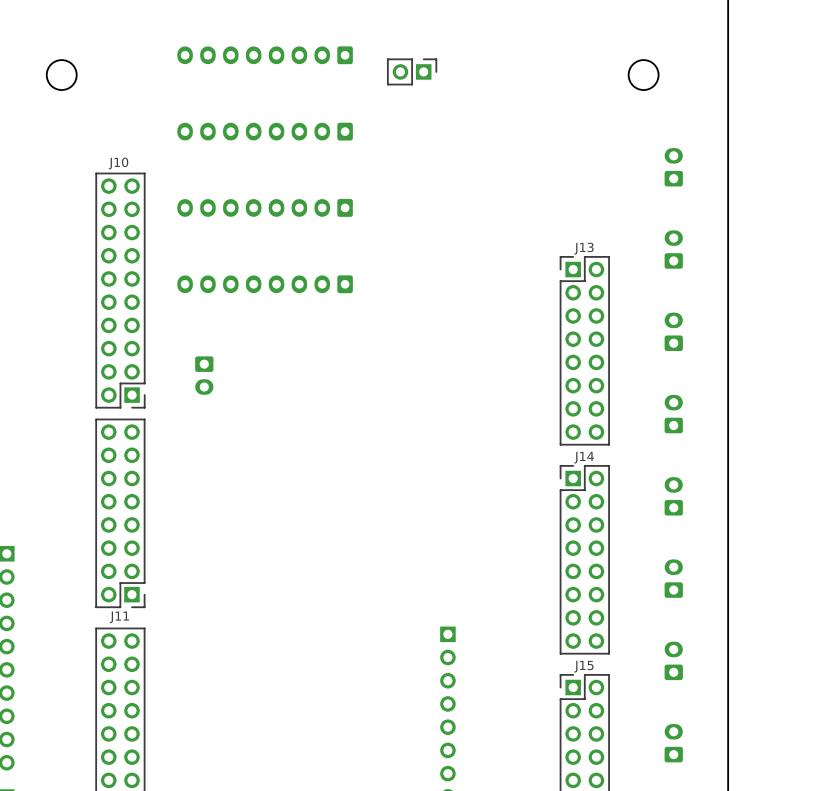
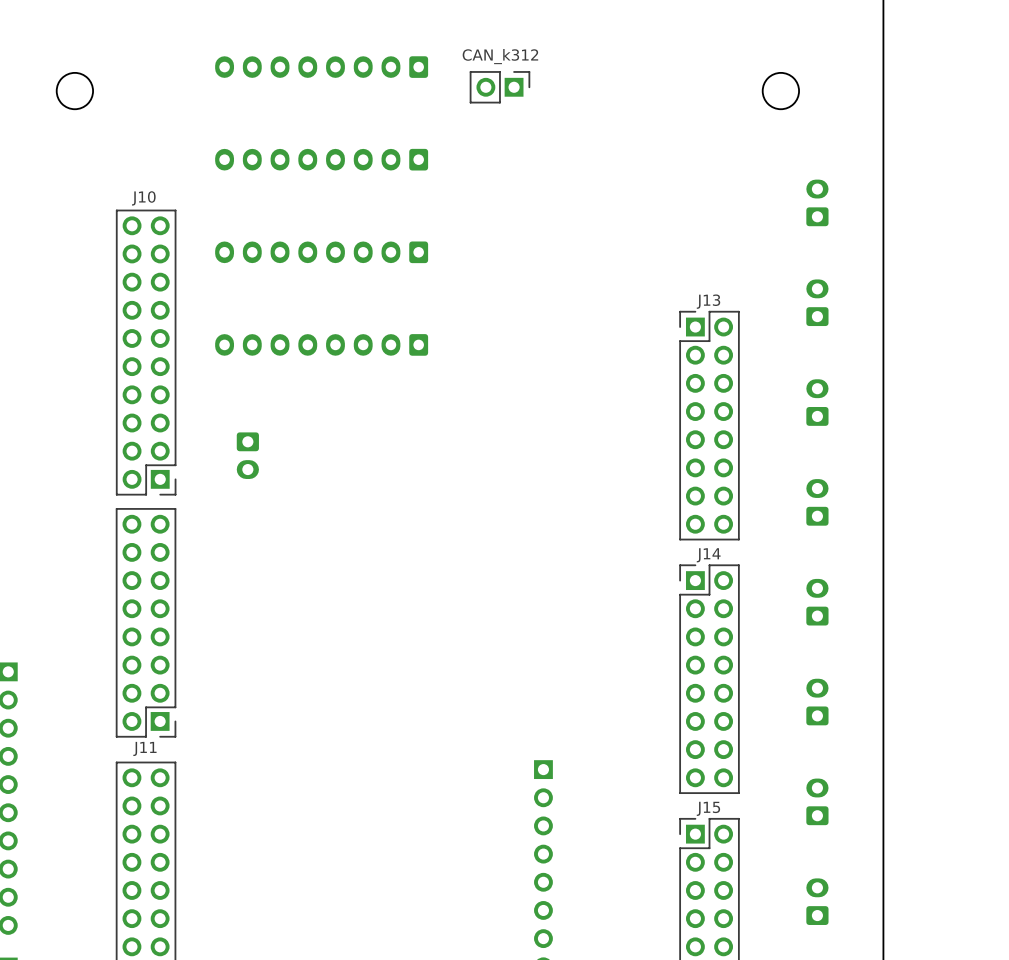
CAN_k312 name: none -> CAN_k312 (500, 56)

